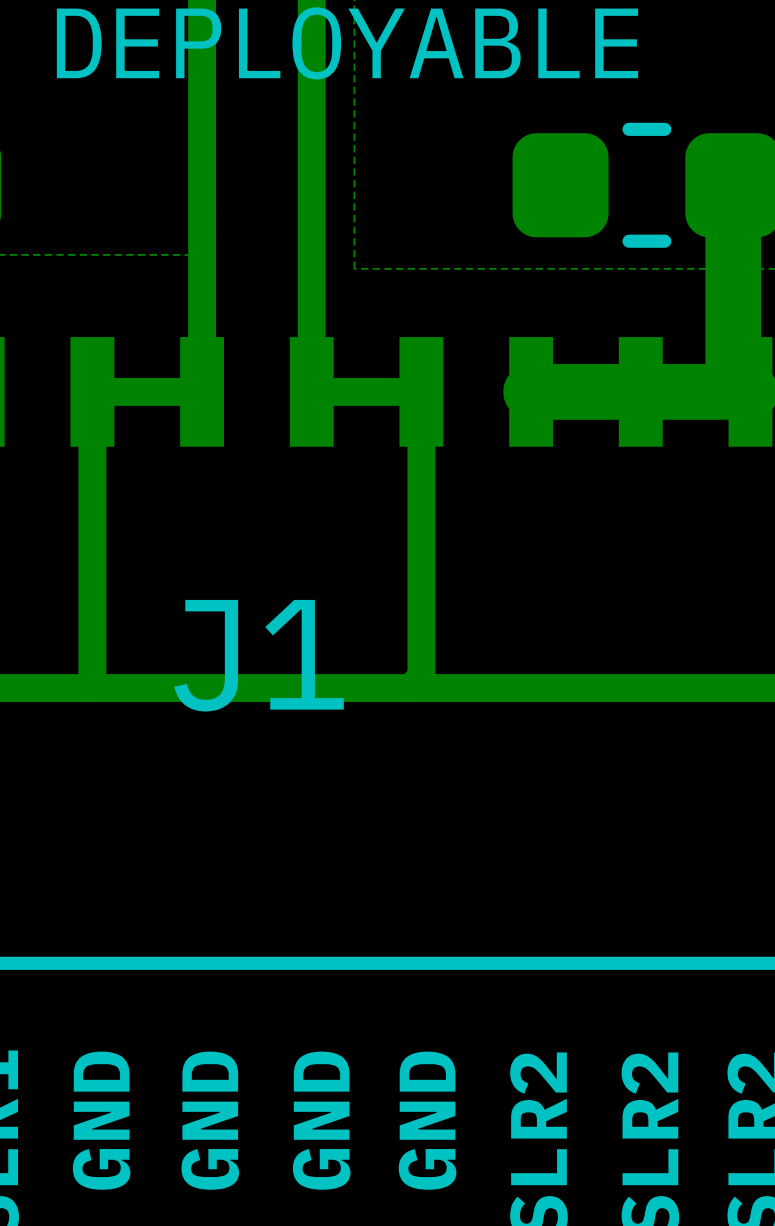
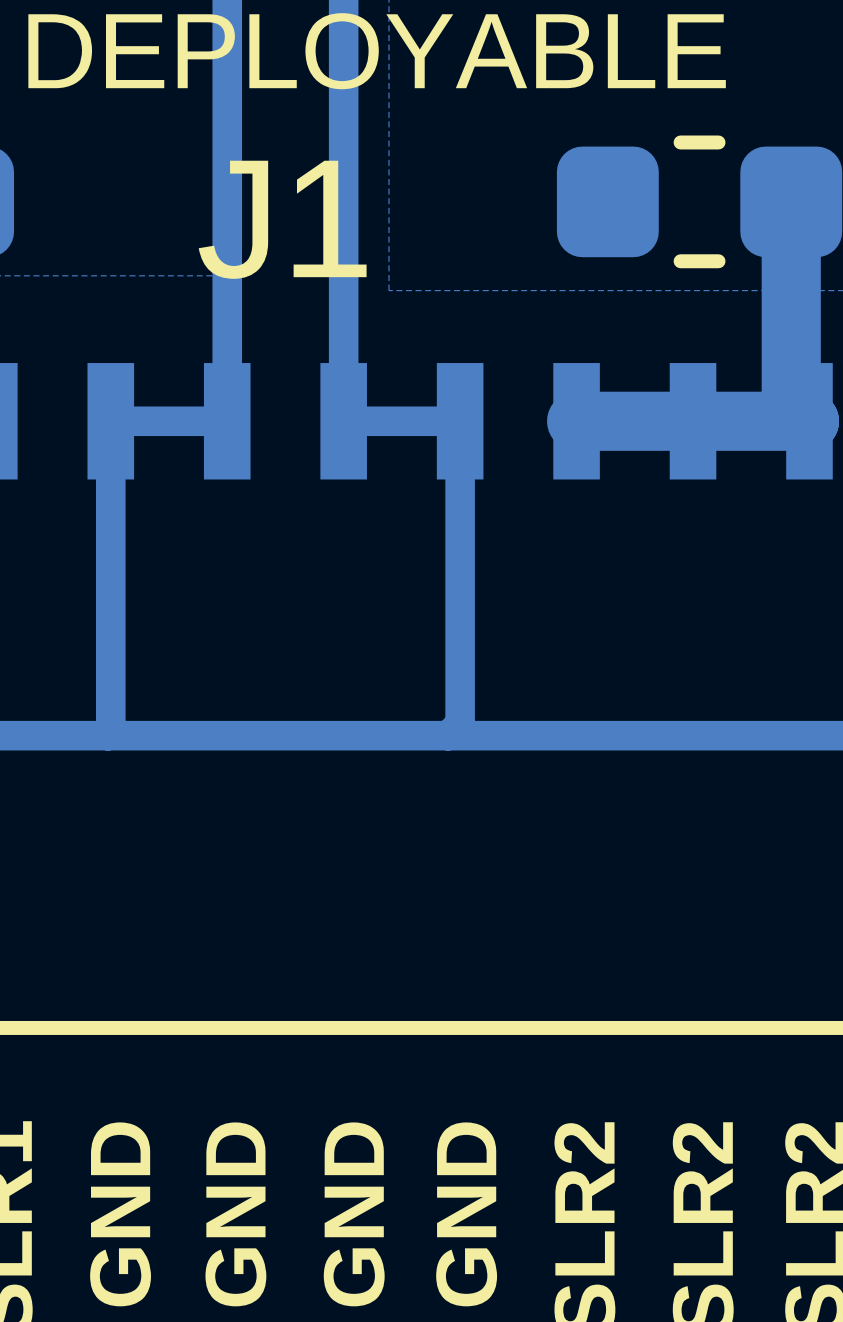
J1 name position: J1 (259, 655) -> J1 (282, 219)

